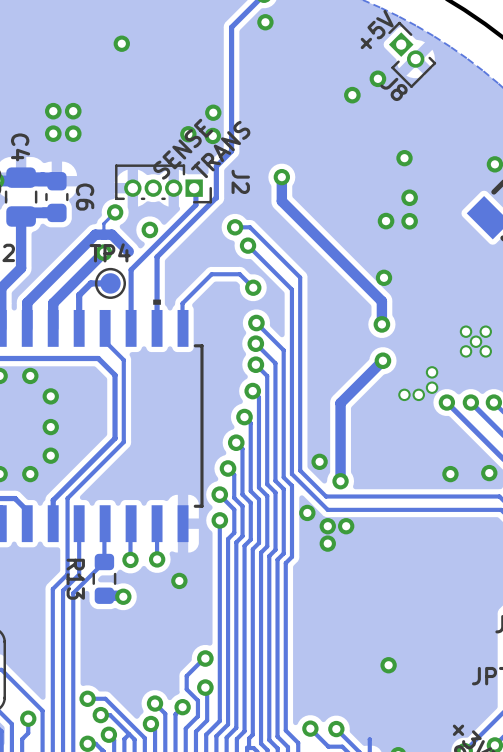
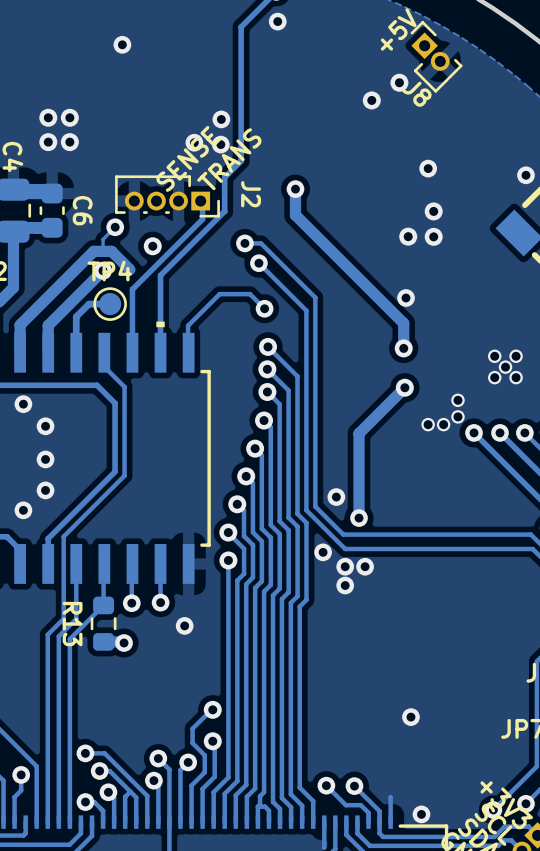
via: (489, 473) -> none
via: (450, 474) -> none

